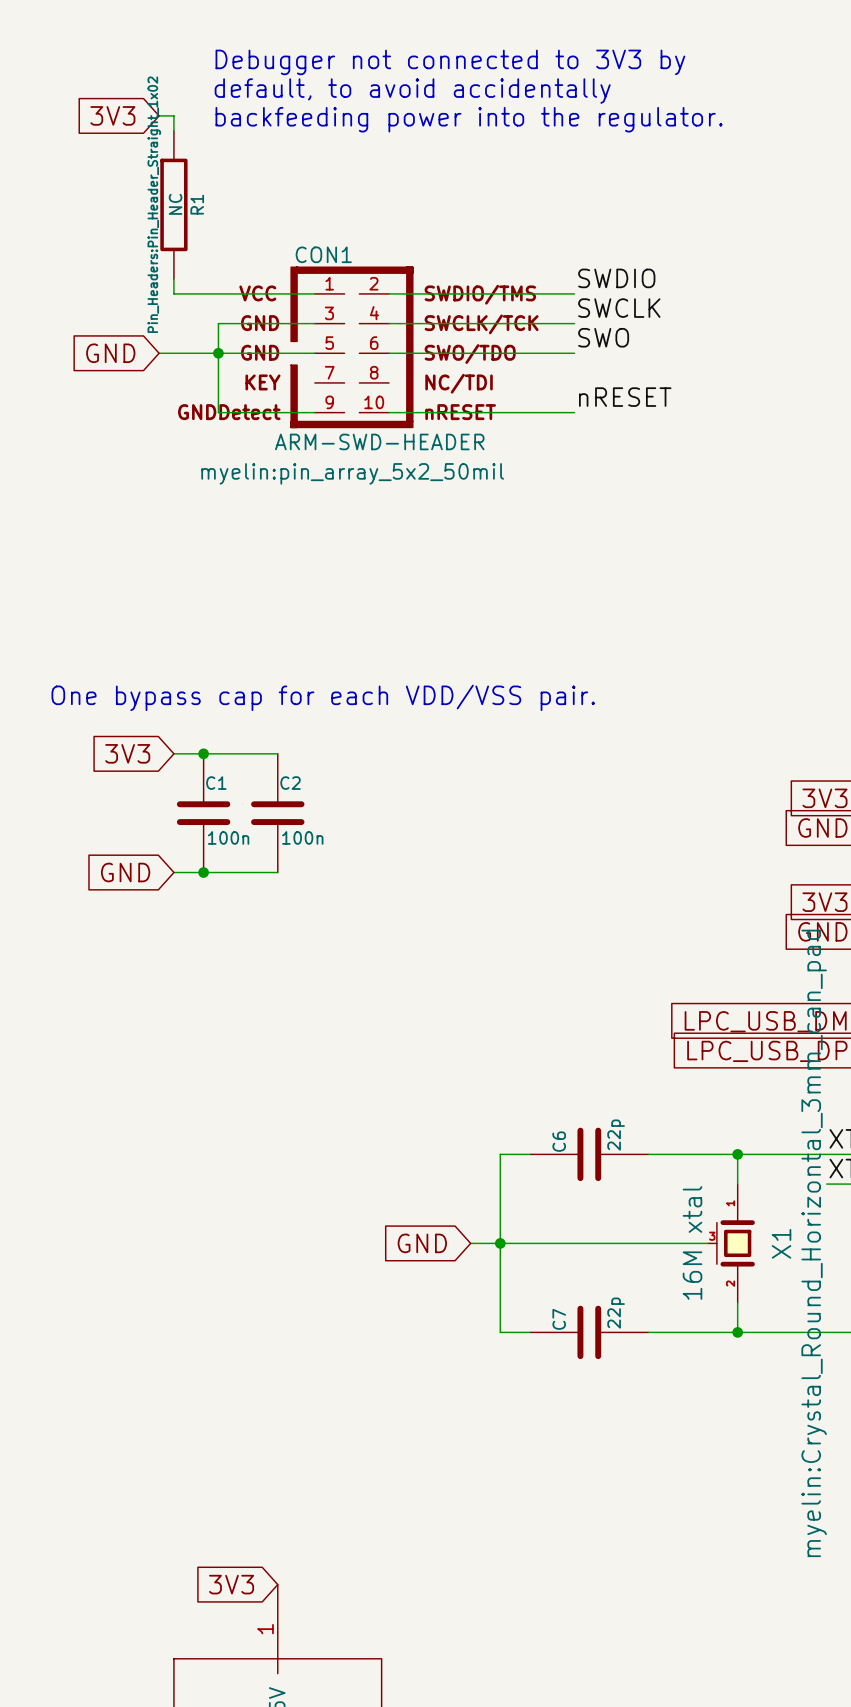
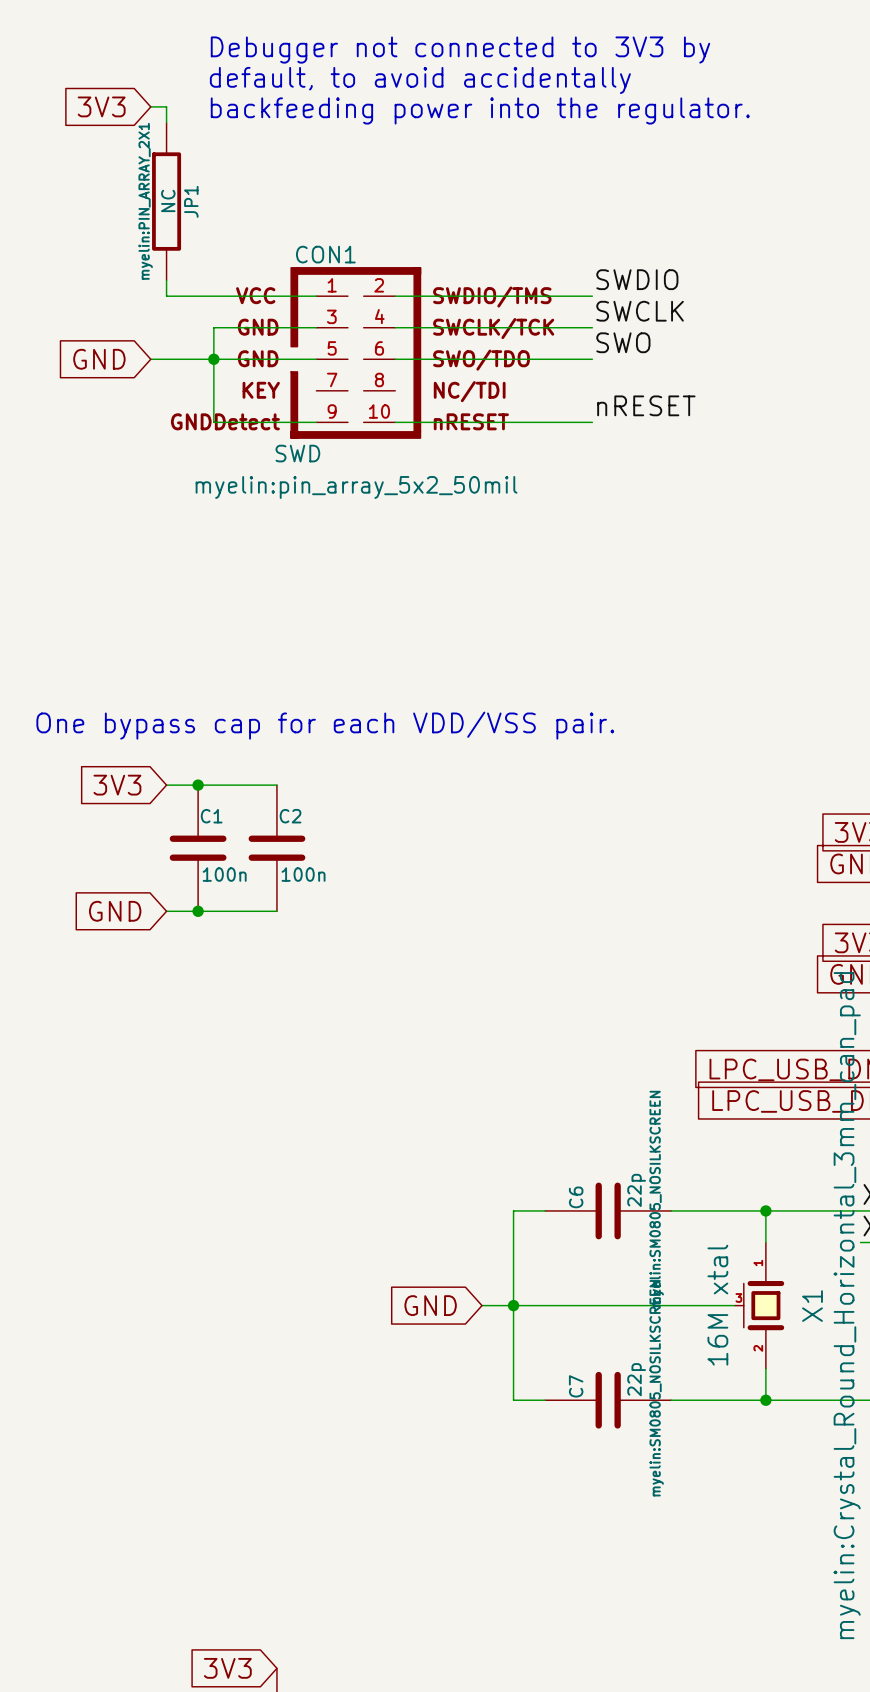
R1 text: Pin_Headers:Pin_Header_Straight_1x02 (154, 204) -> myelin:PIN_ARRAY_2X1 (145, 201)
R1 name: R1 (197, 204) -> JP1 (191, 201)
CON1 value: ARM-SWD-HEADER (379, 441) -> SWD (297, 453)
C6 text: none -> myelin:SM0805_NOSILKSCREEN (656, 1198)
C7 text: none -> myelin:SM0805_NOSILKSCREEN (656, 1388)

